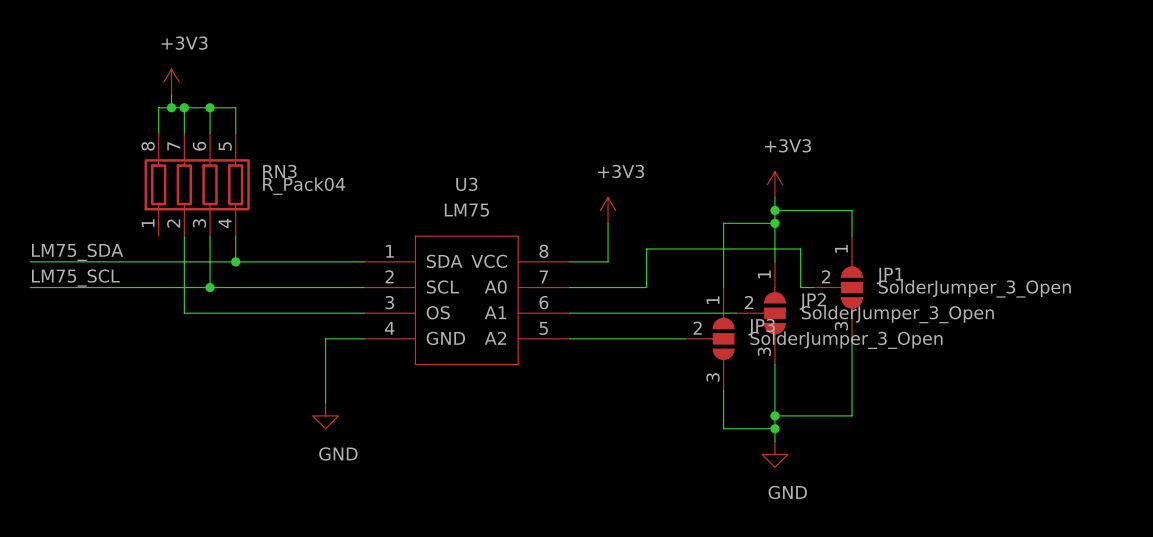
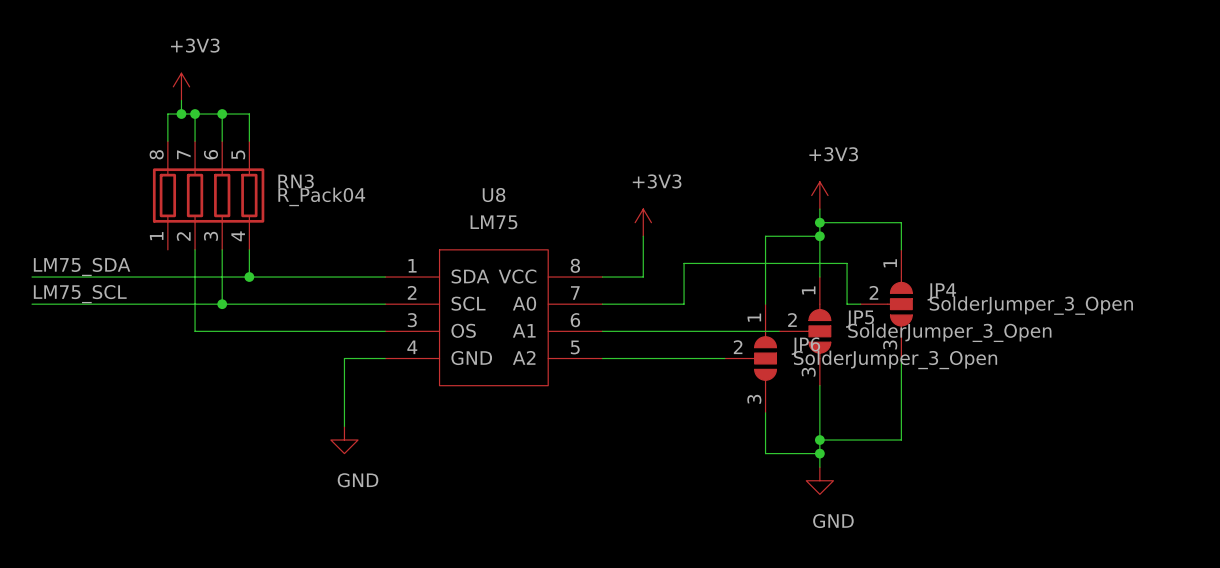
U3 name: U3 (466, 184) -> U8 (494, 195)
JP1 name: JP1 (889, 275) -> JP4 (941, 291)
JP2 name: JP2 (812, 301) -> JP5 (860, 319)
JP3 name: JP3 (761, 327) -> JP6 (805, 346)

